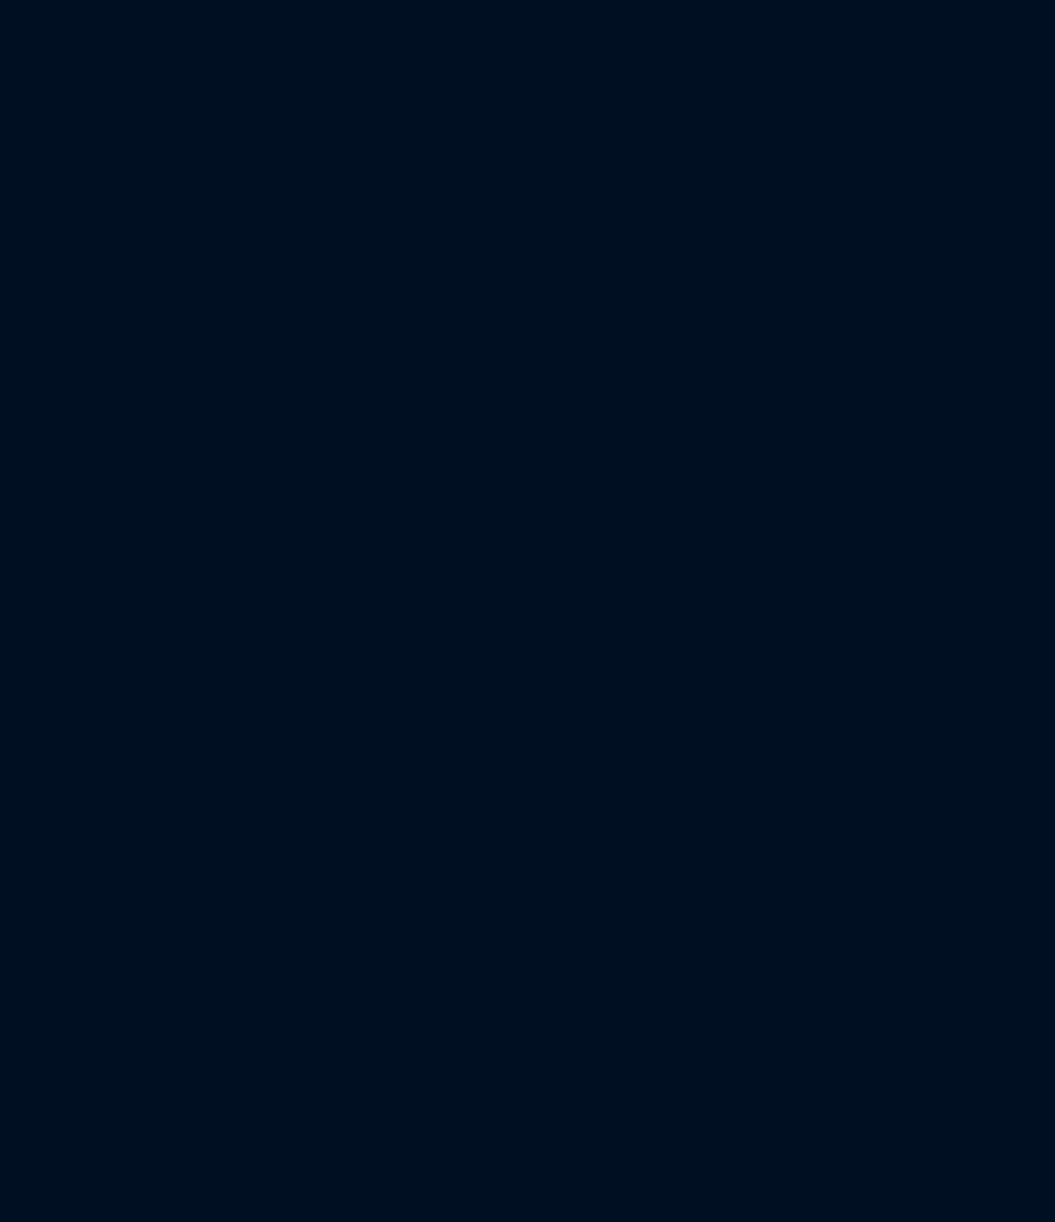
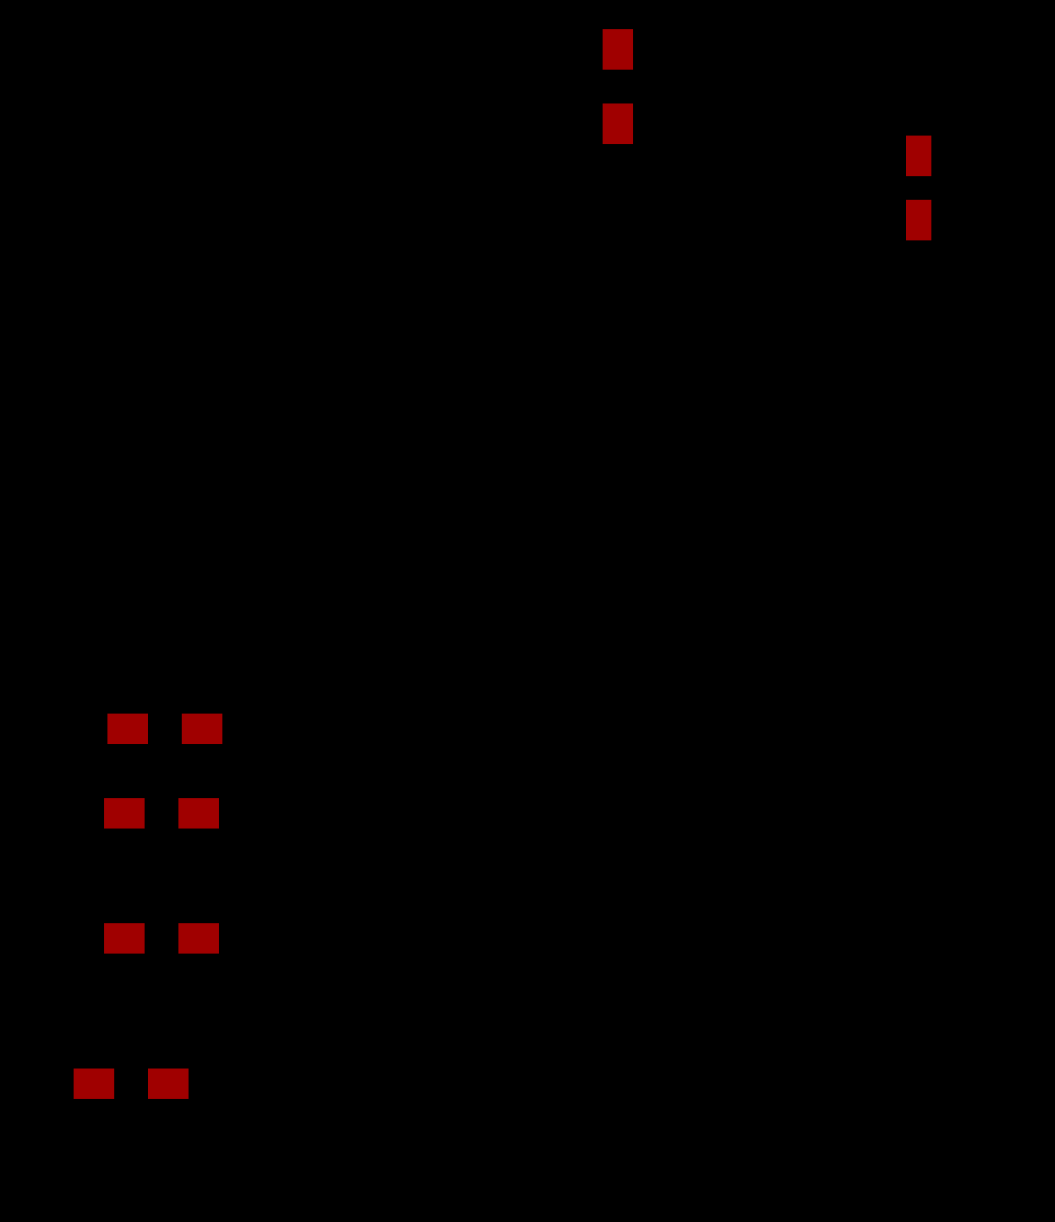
part: none -> (617, 86)
part: none -> (918, 187)
part: none -> (164, 728)
part: none -> (161, 813)
part: none -> (161, 938)
part: none -> (131, 1083)

